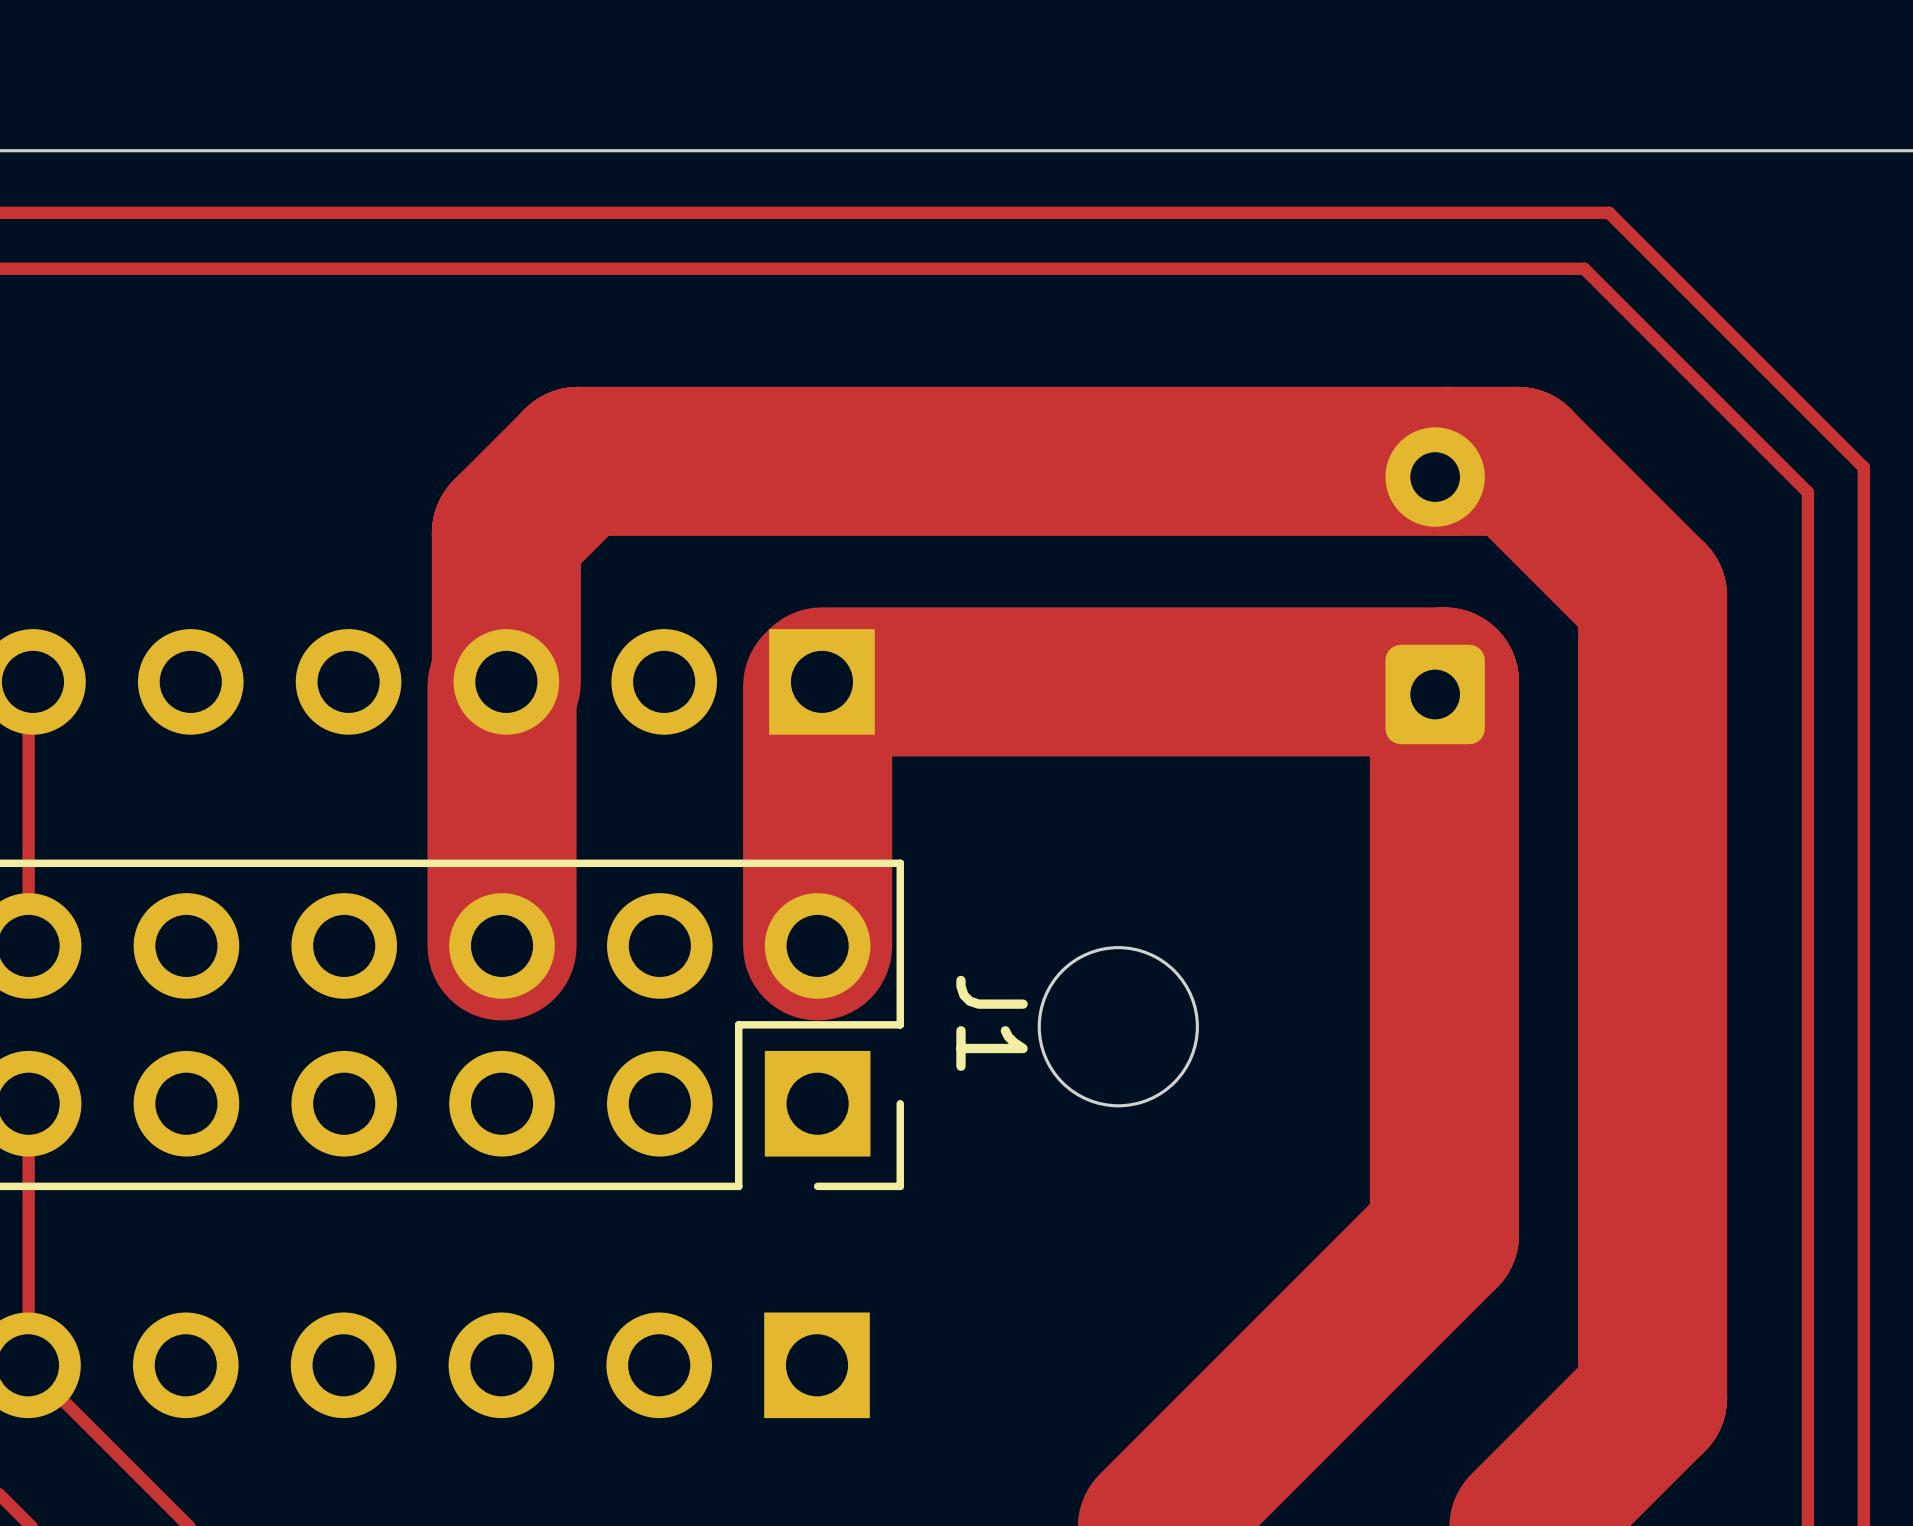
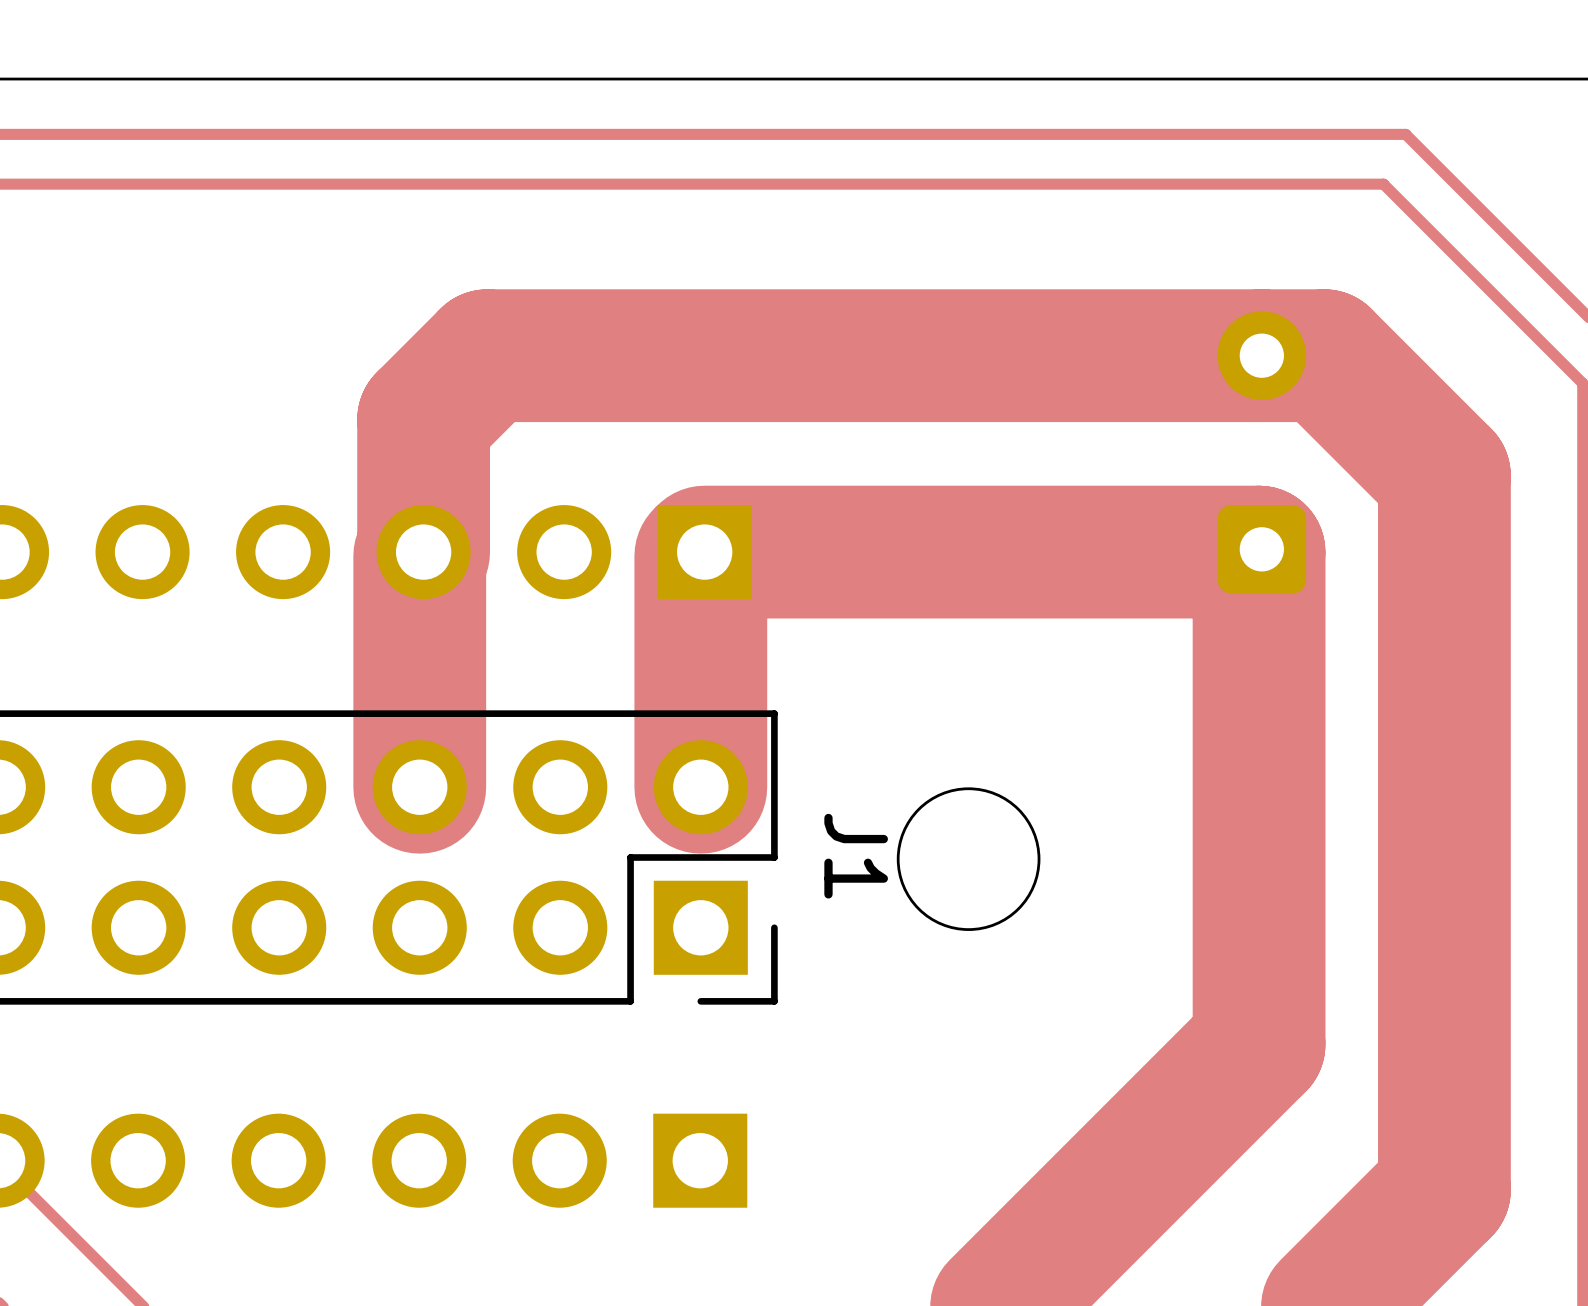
part position: (1435, 585) -> (1261, 452)

